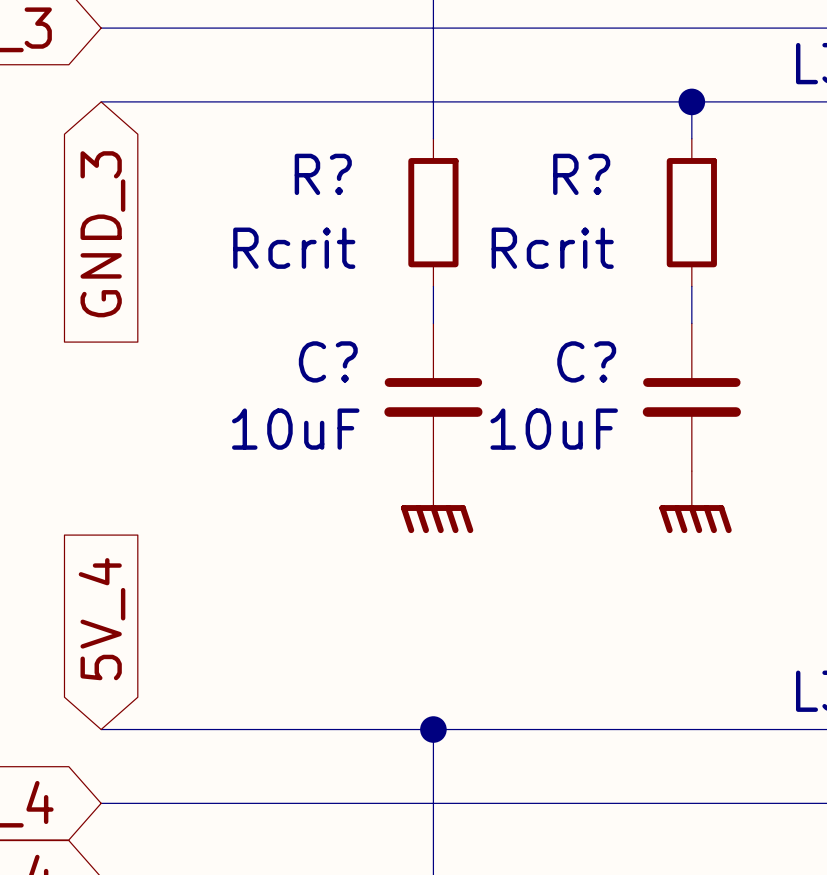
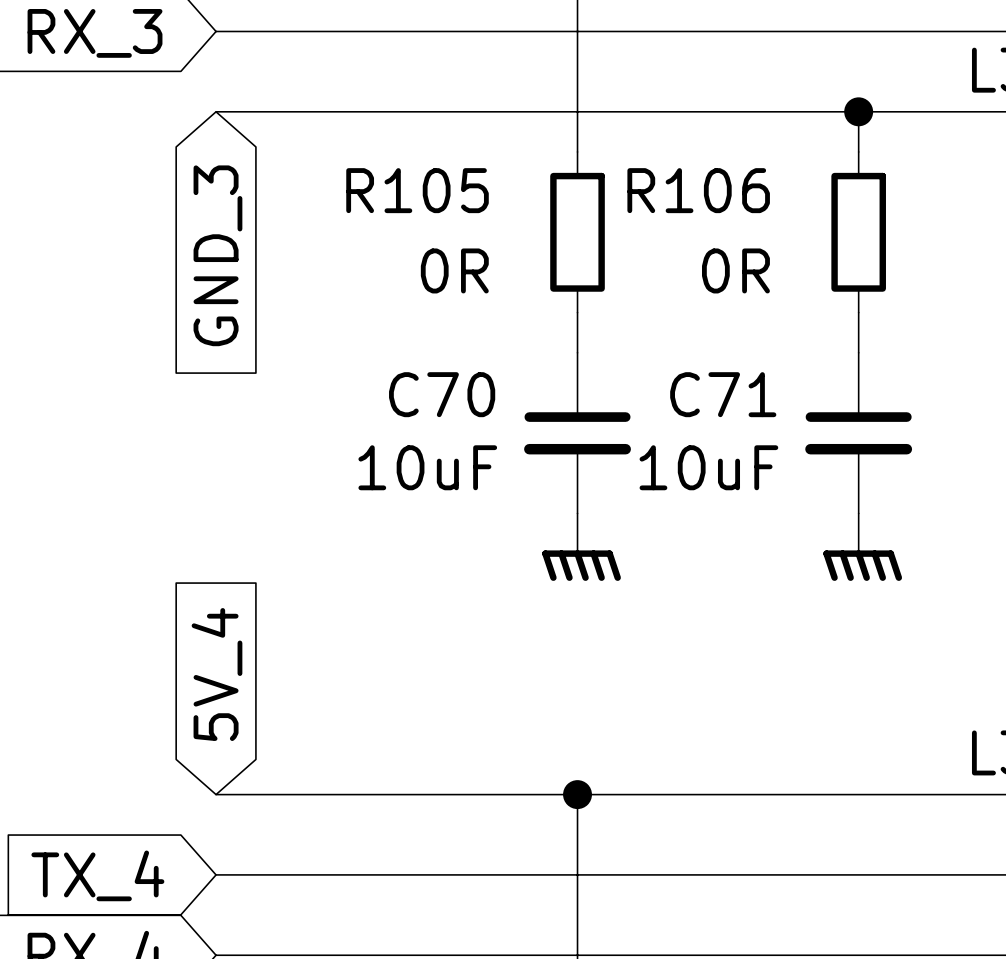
R? name: R? (323, 174) -> R105 (417, 190)
R? name: R? (581, 174) -> R106 (698, 190)
R? value: Rcrit (294, 248) -> 0R (454, 270)
R? value: Rcrit (552, 248) -> 0R (735, 270)
C? name: C? (328, 361) -> C70 (442, 394)
C? name: C? (586, 361) -> C71 (723, 394)

